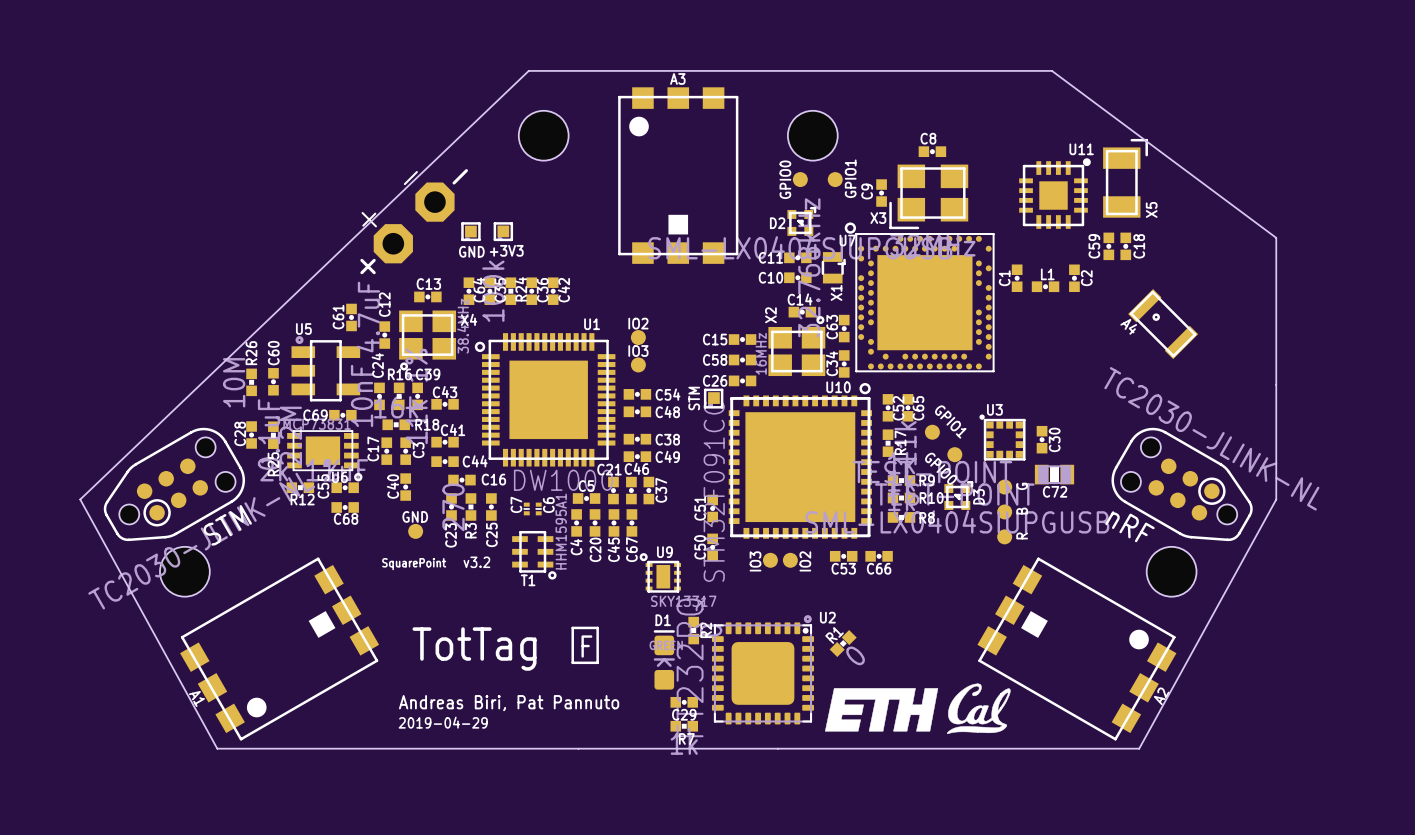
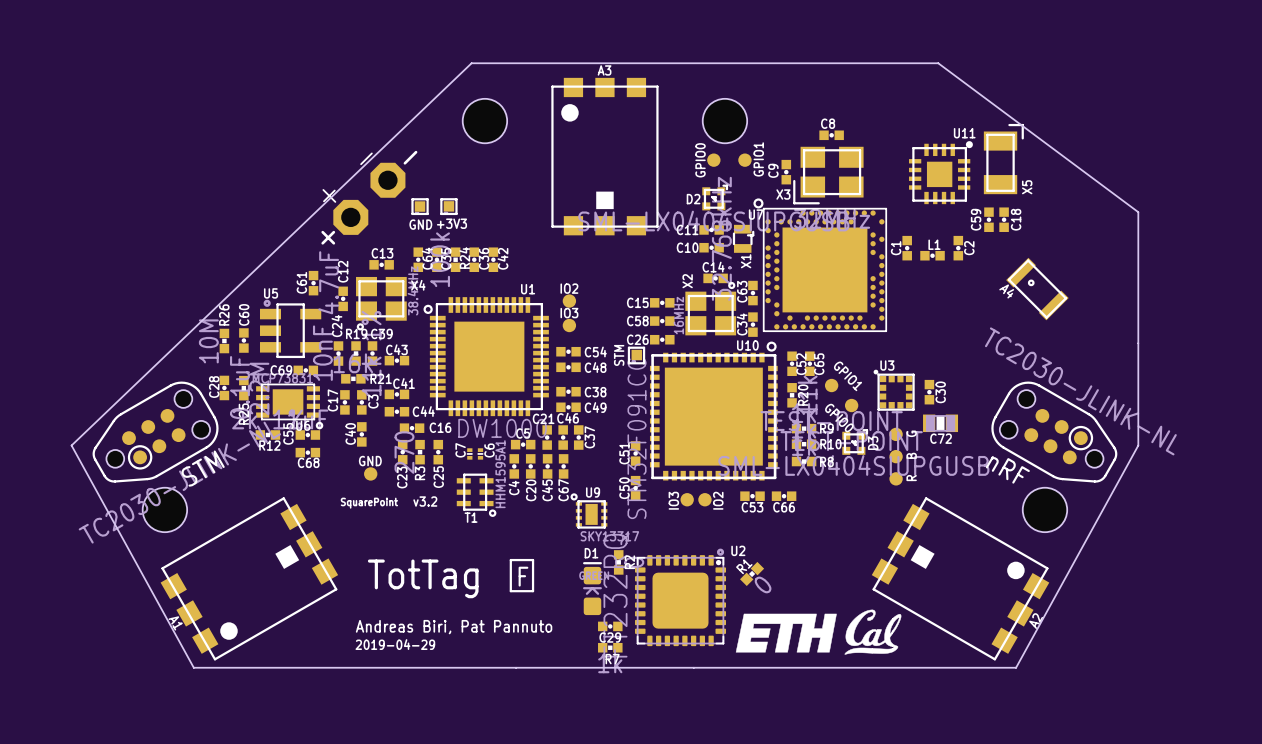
R16 name: R16 (399, 374) -> R19 (356, 333)
R18 name: R18 (427, 424) -> R21 (381, 378)
R17 name: R17 (900, 442) -> R20 (803, 395)

